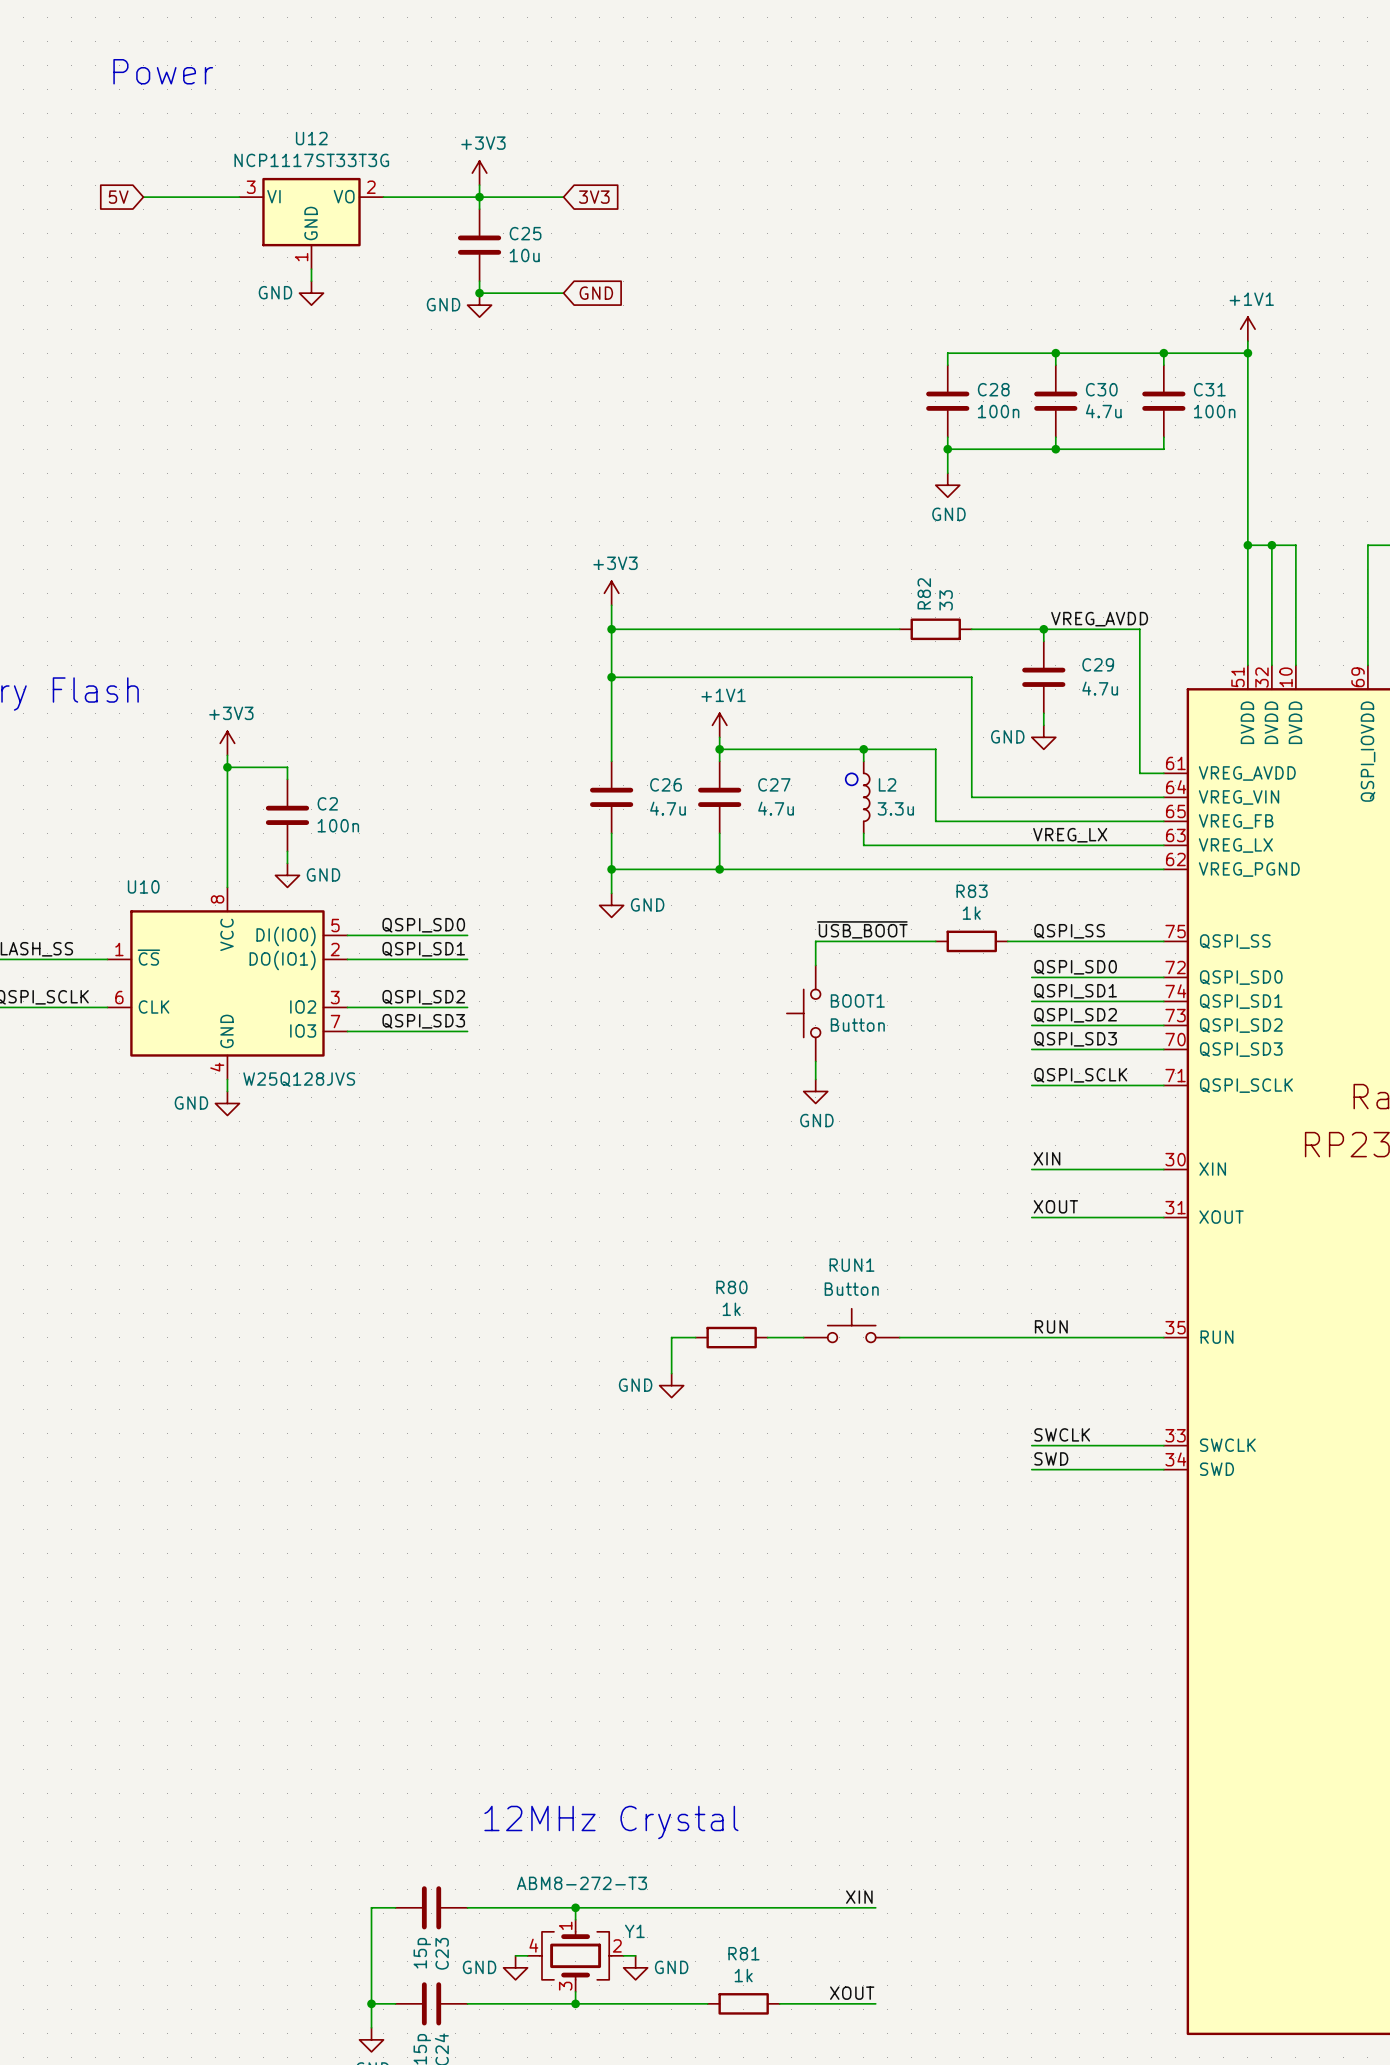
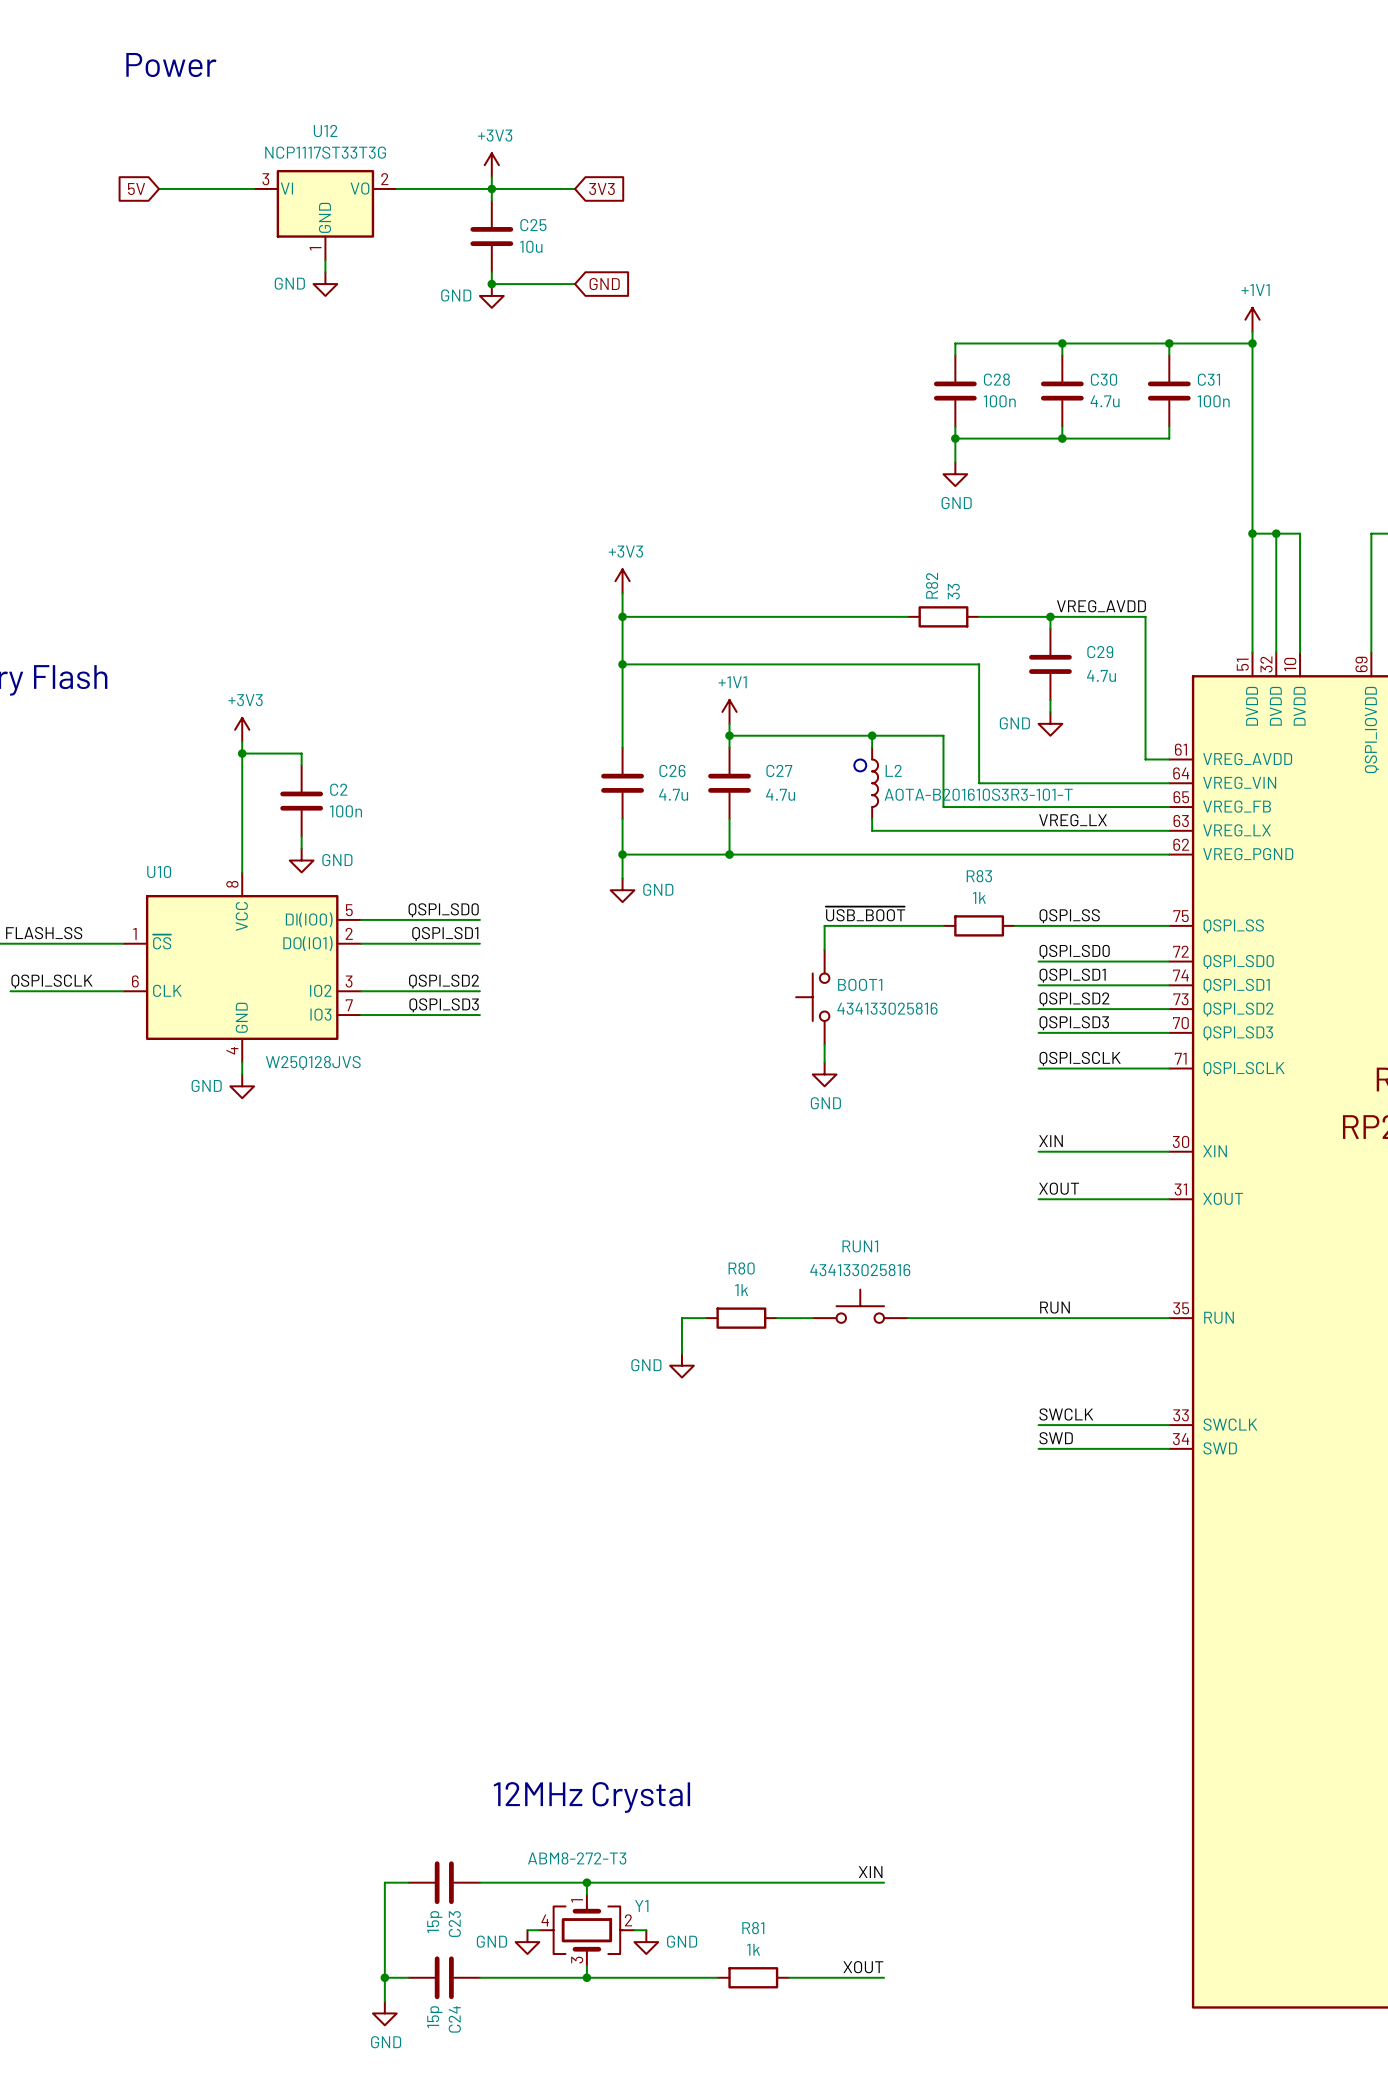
L2 value: 3.3u (895, 808) -> AOTA-B201610S3R3-101-T (978, 794)
BOOT1 value: Button (857, 1025) -> 434133025816 (887, 1008)
RUN1 value: Button (851, 1289) -> 434133025816 (860, 1270)

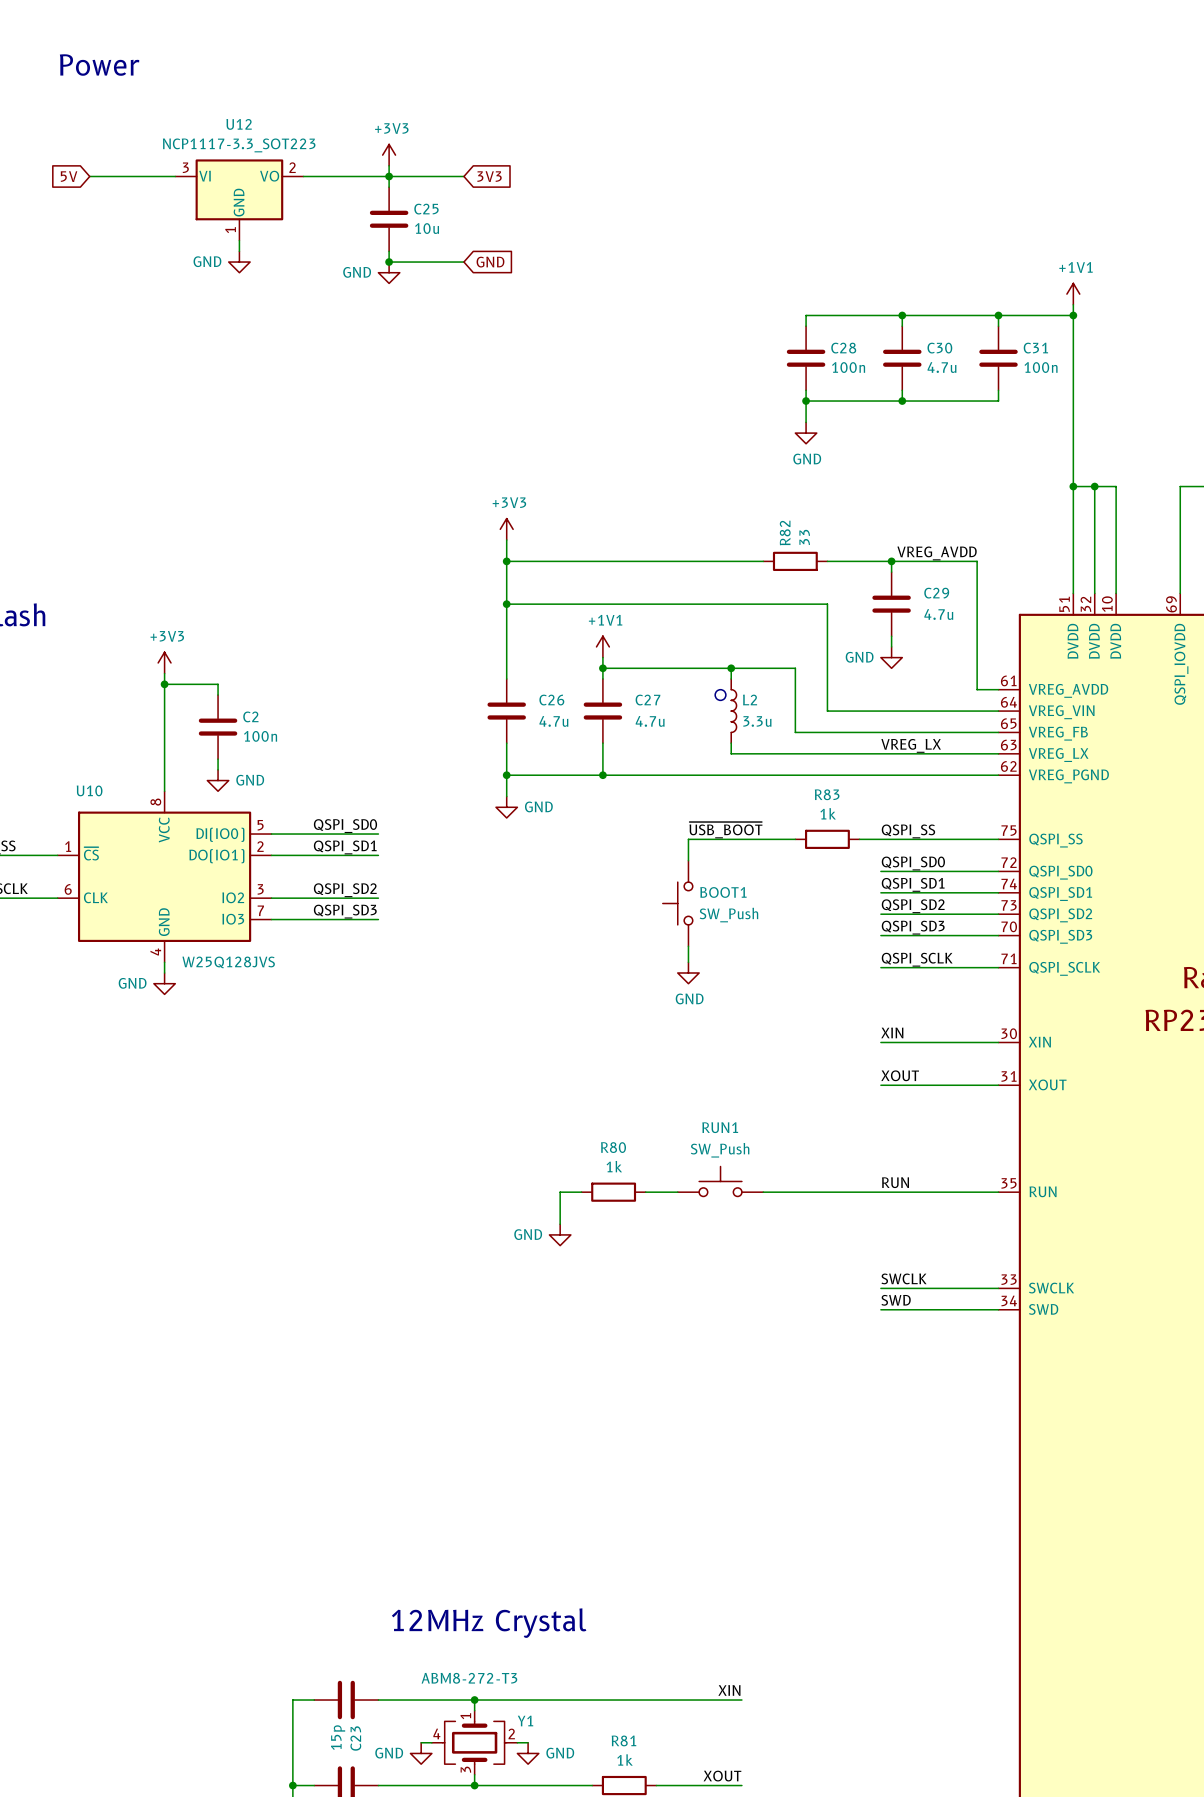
U12 value: NCP1117ST33T3G (325, 152) -> NCP1117-3.3_SOT223 (239, 145)
L2 value: AOTA-B201610S3R3-101-T (978, 794) -> 3.3u (757, 721)
BOOT1 value: 434133025816 (887, 1008) -> SW_Push (728, 915)
RUN1 value: 434133025816 (860, 1270) -> SW_Push (720, 1150)

